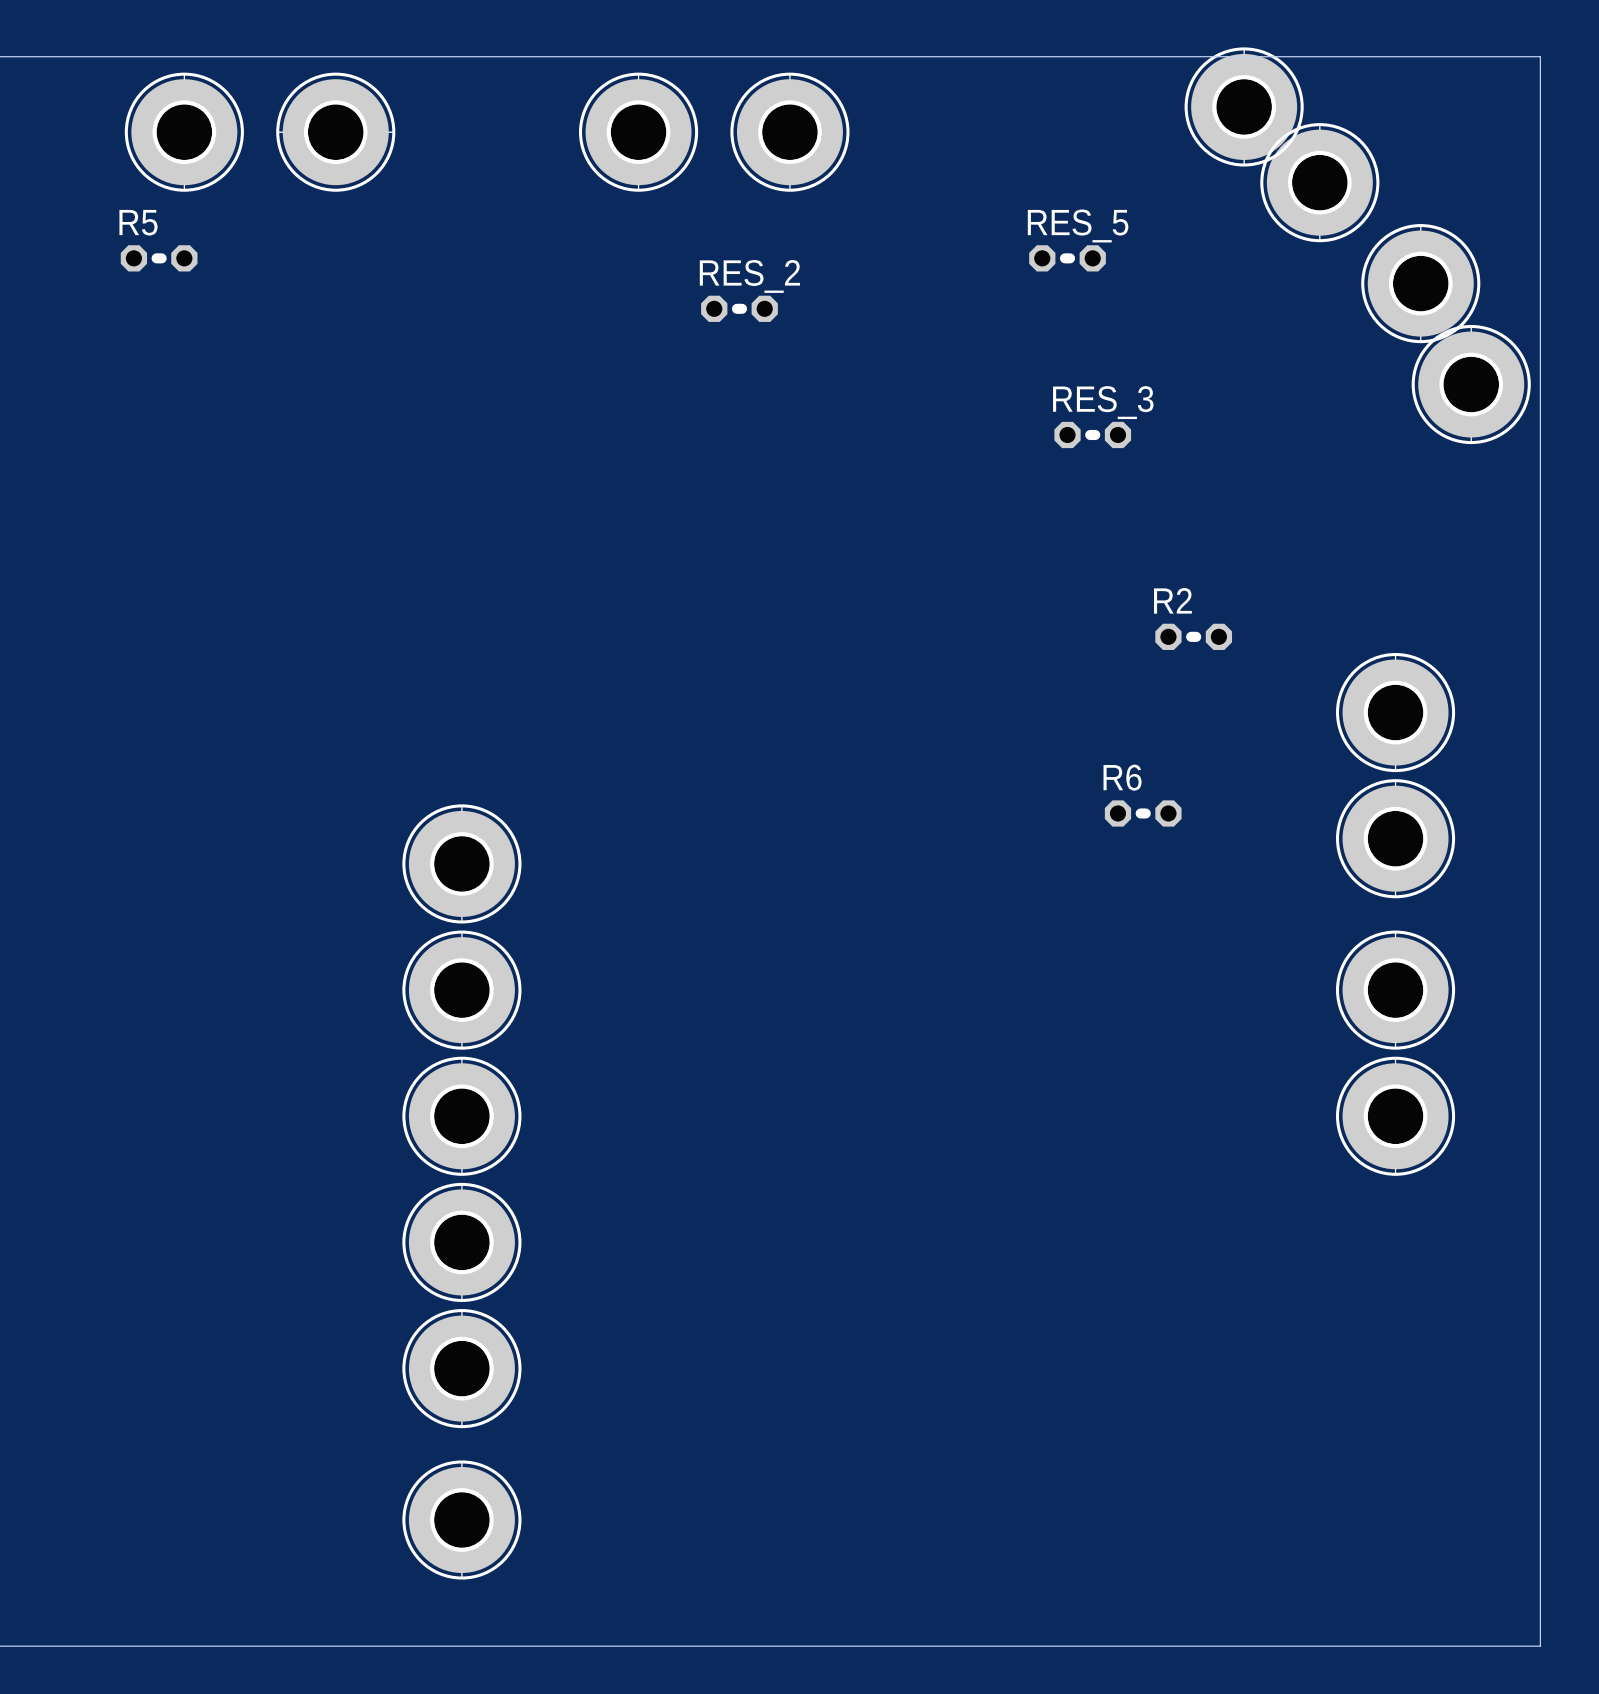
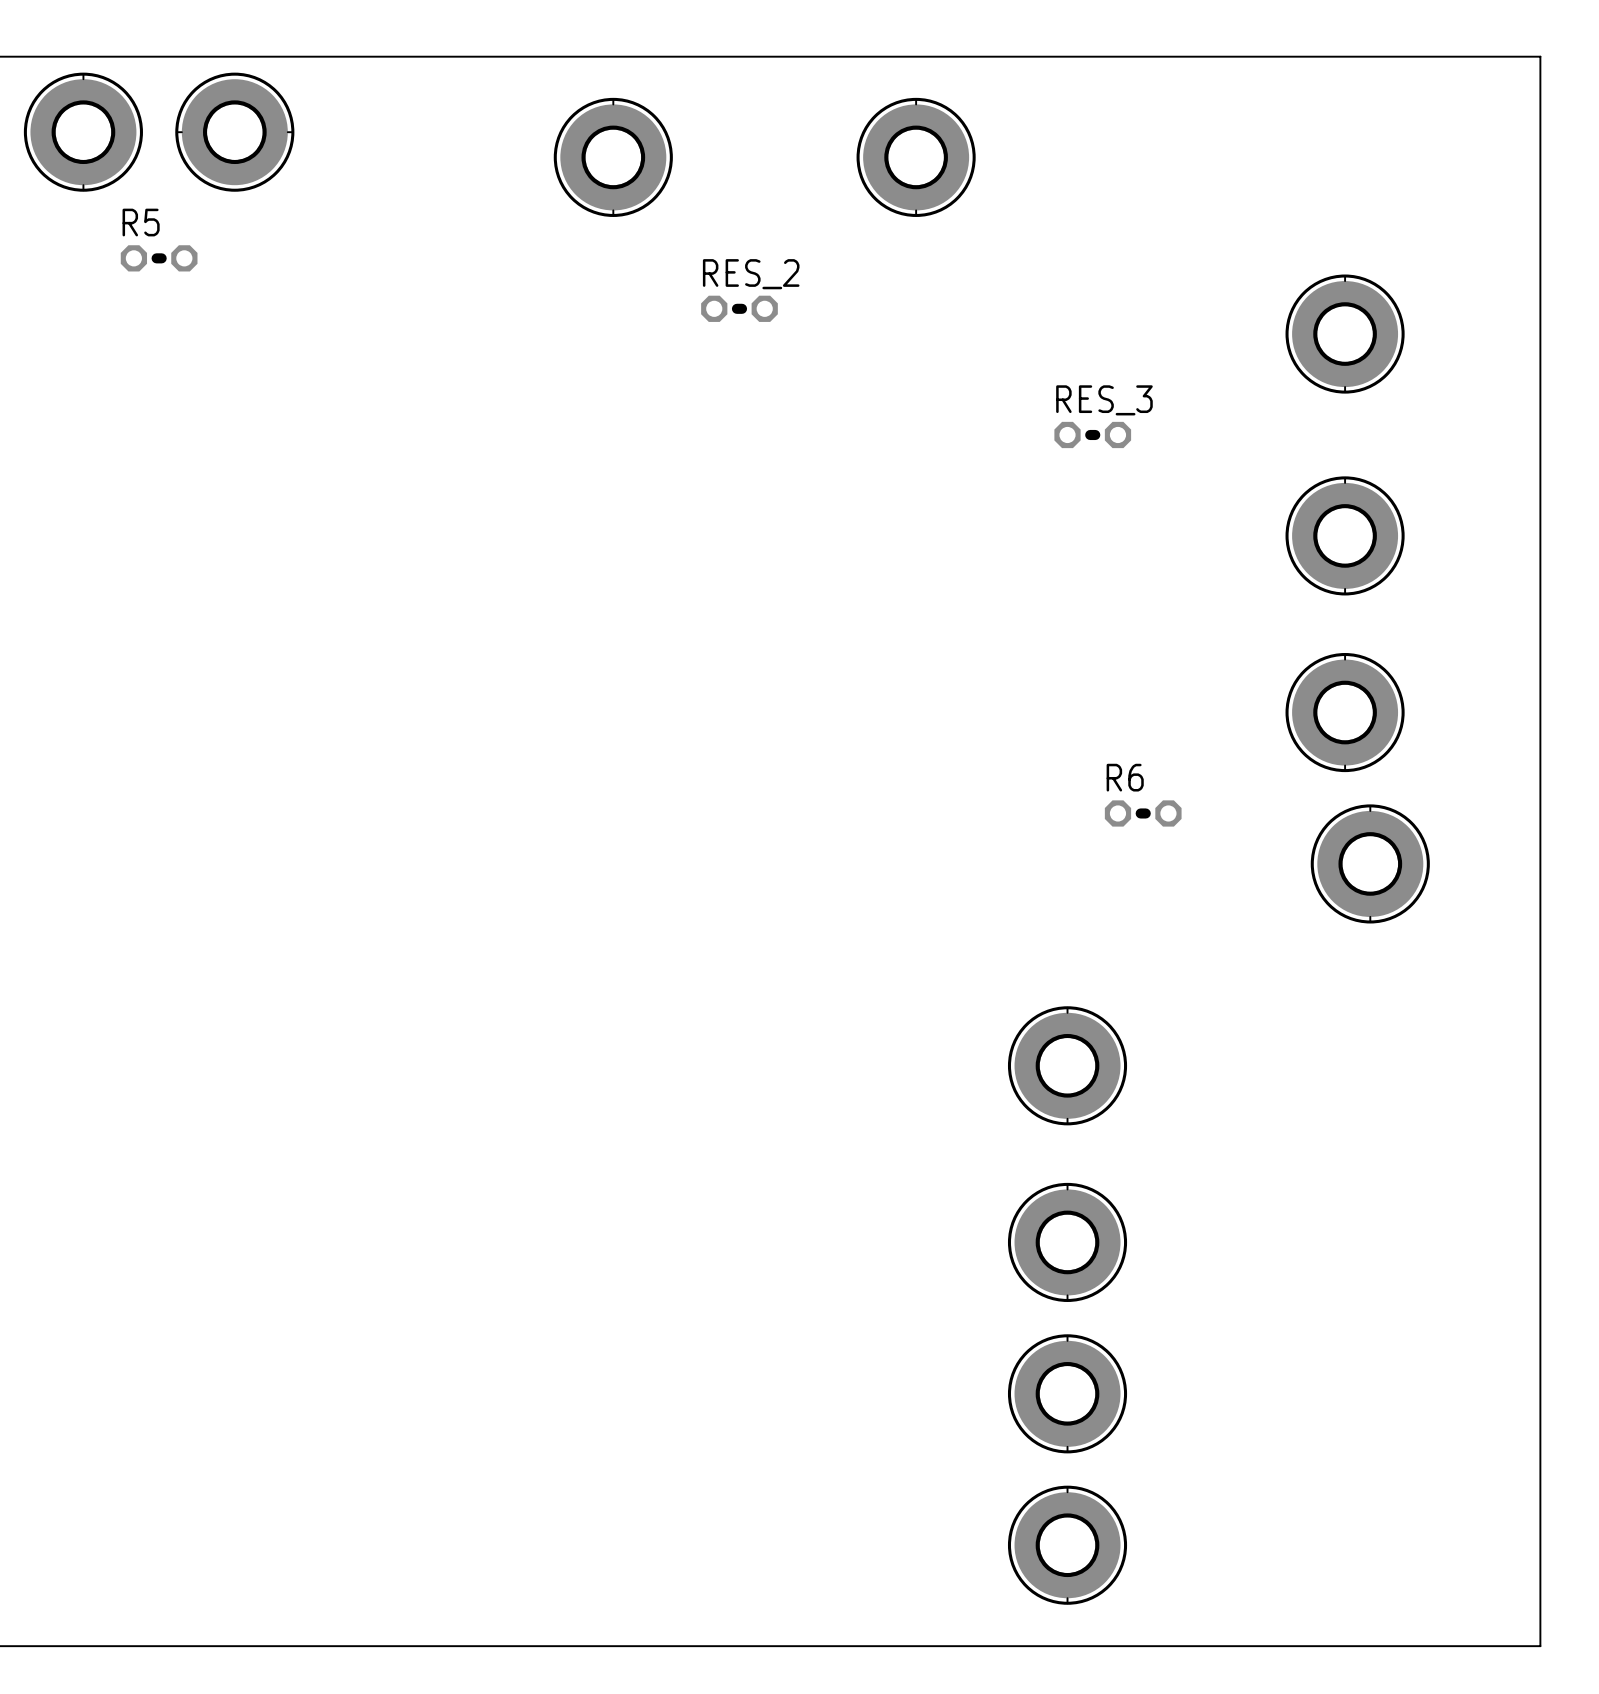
part: (1244, 106) -> none
part: none -> (83, 132)
part: (184, 132) -> none
part: none -> (234, 132)
part: (335, 132) -> none
part position: (638, 132) -> (613, 157)
part: (789, 132) -> none
part: none -> (916, 157)
part: (1319, 182) -> none
RES_5: (1067, 258) -> none
part: (1420, 283) -> none
part: none -> (1345, 334)
part: (1471, 384) -> none
part: none -> (1345, 535)
R2: (1193, 636) -> none
part position: (1395, 712) -> (1345, 712)
part position: (1395, 838) -> (1370, 863)
part: (461, 863) -> none
part: (461, 990) -> none
part: (1395, 990) -> none
part: none -> (1067, 1065)
part: (461, 1116) -> none
part: (1395, 1116) -> none
part: (461, 1242) -> none
part: none -> (1067, 1242)
part: (461, 1368) -> none
part: none -> (1067, 1393)
part: (461, 1520) -> none
part: none -> (1067, 1545)

